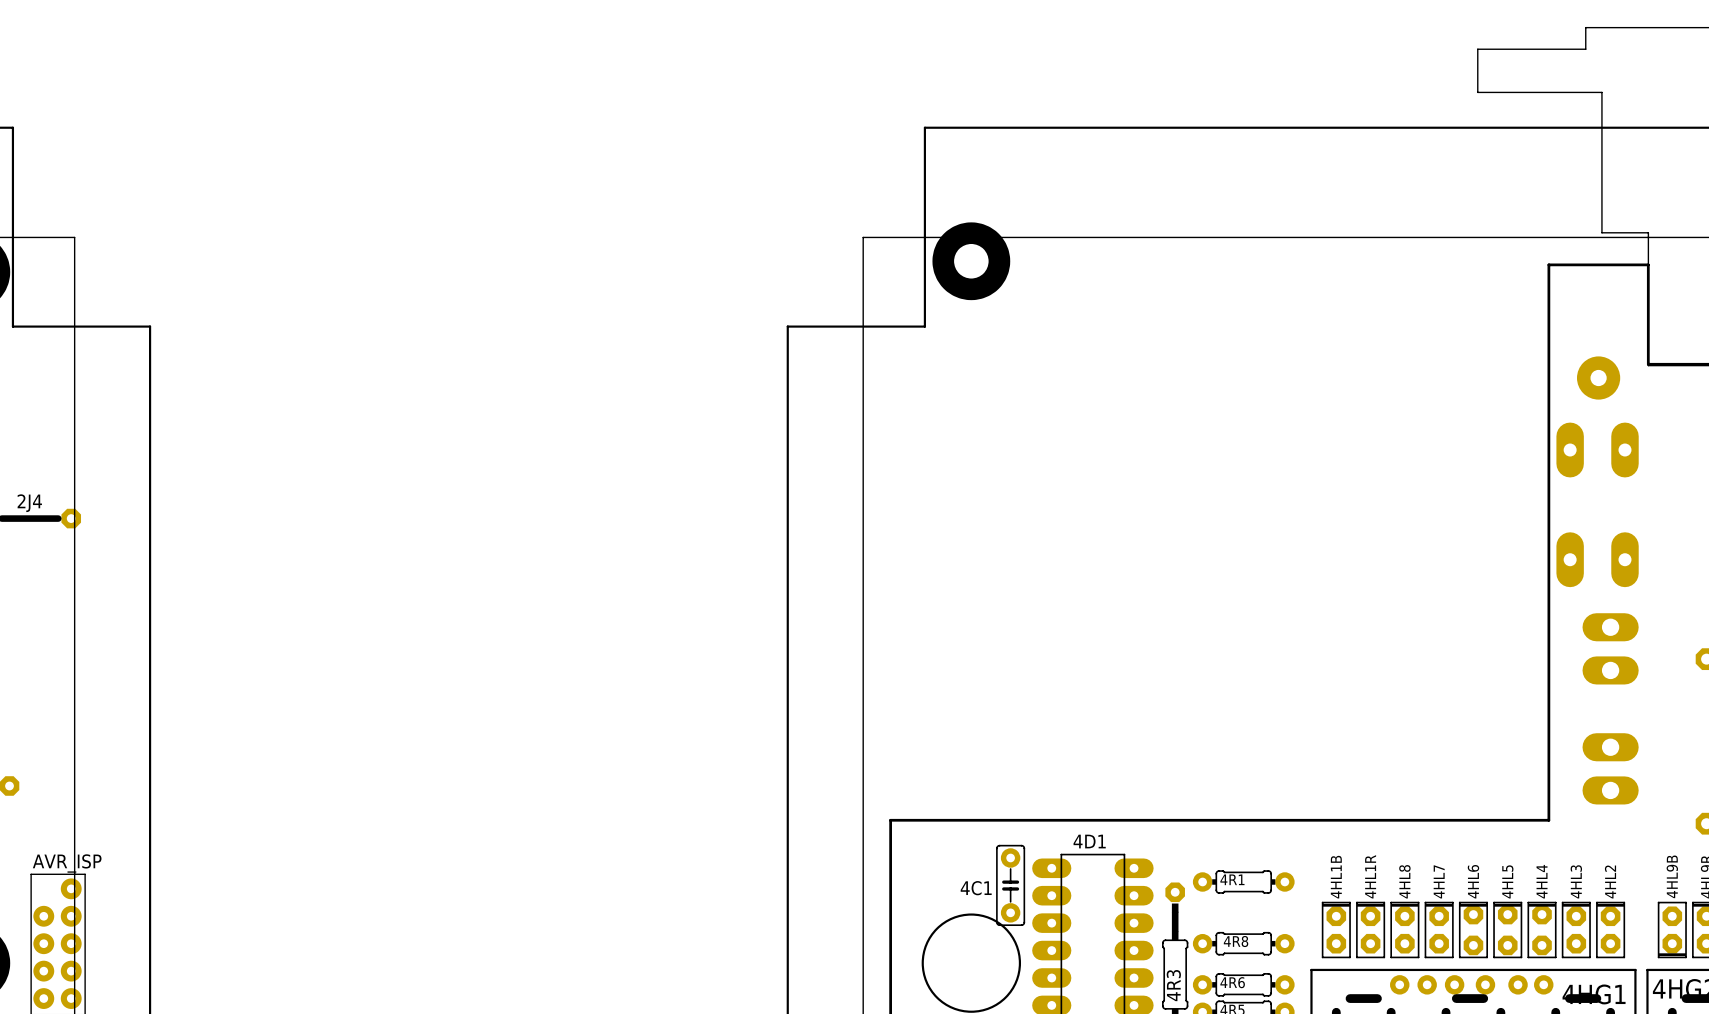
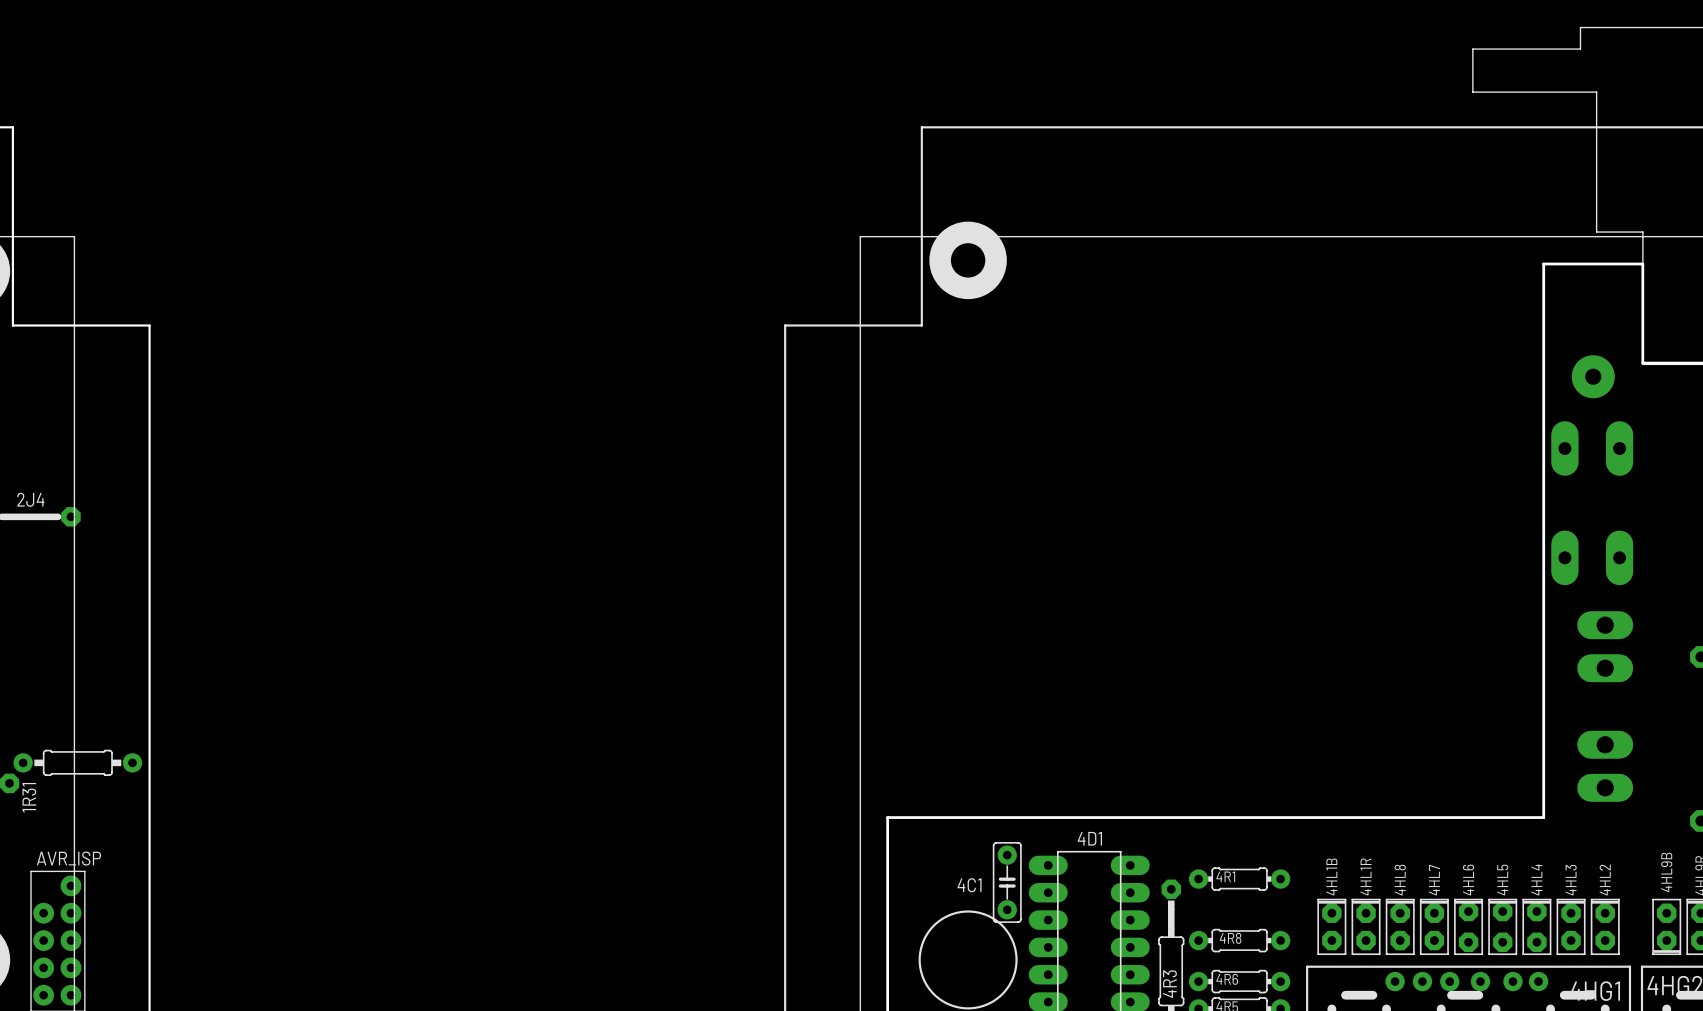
1R31: none -> (77, 762)

